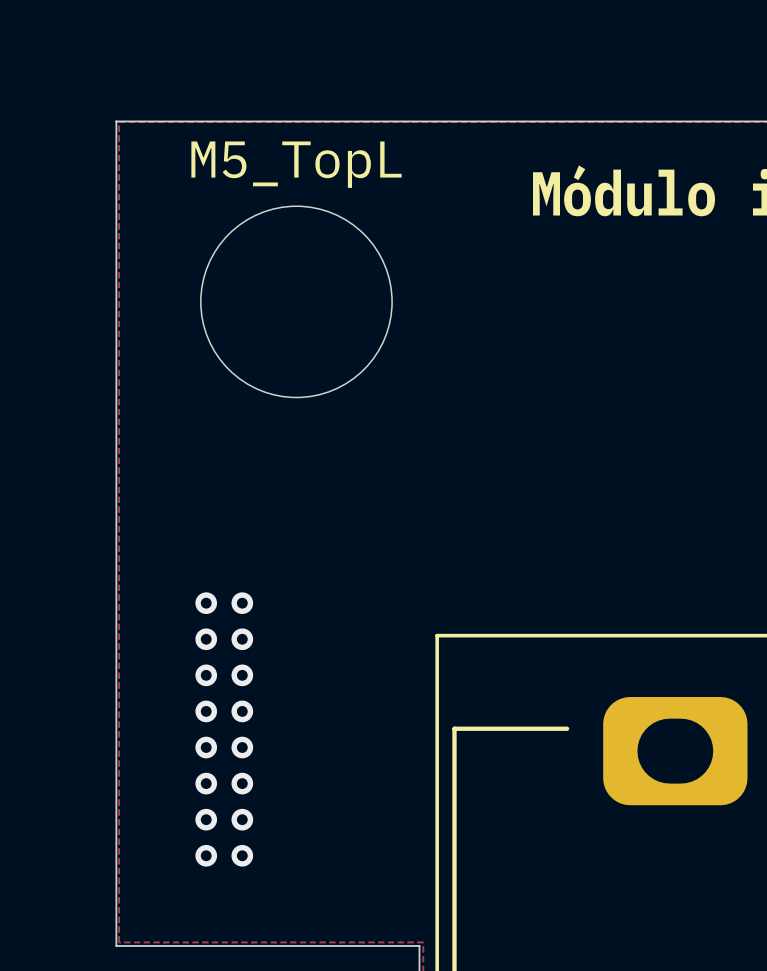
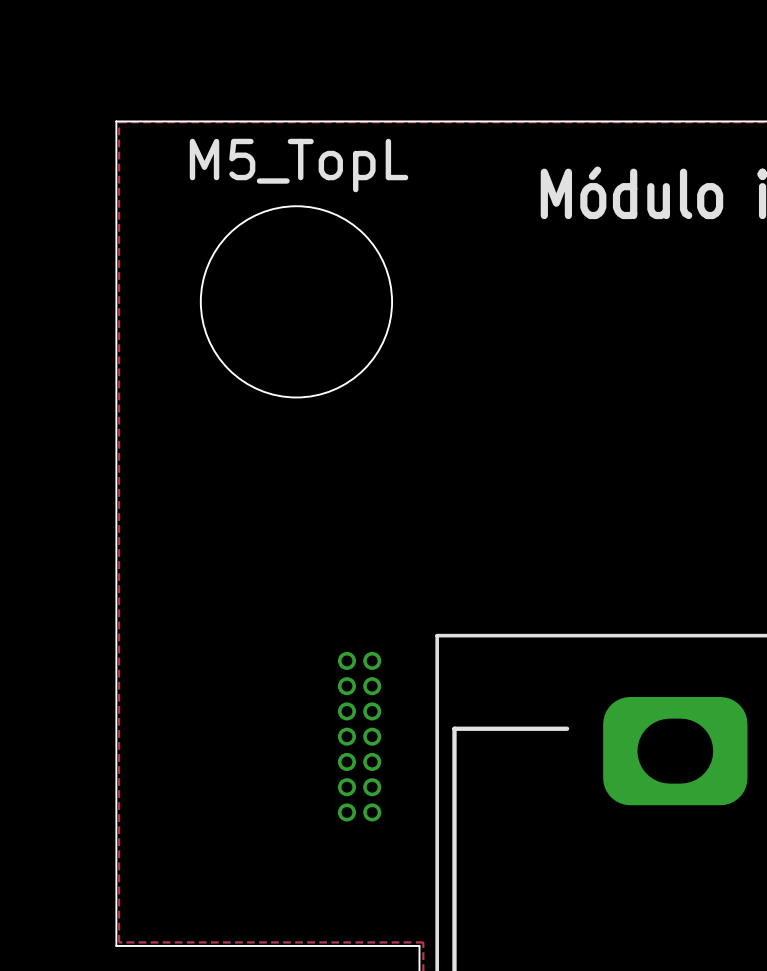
via: (206, 603) -> none
via: (242, 603) -> none
via: (206, 639) -> none
via: (242, 639) -> none
via: none -> (346, 660)
via: none -> (372, 660)
via: (206, 675) -> none
via: (242, 675) -> none
via: none -> (346, 686)
via: none -> (372, 686)
via: (206, 711) -> none
via: (242, 711) -> none
via: none -> (346, 711)
via: none -> (372, 711)
via: none -> (346, 736)
via: none -> (372, 736)
via: (206, 747) -> none
via: (242, 747) -> none
via: none -> (346, 761)
via: none -> (372, 761)
via: (206, 783) -> none
via: (242, 783) -> none
via: none -> (346, 787)
via: none -> (372, 787)
via: none -> (346, 812)
via: none -> (372, 812)
via: (206, 819) -> none
via: (242, 819) -> none
via: (206, 855) -> none
via: (242, 855) -> none

